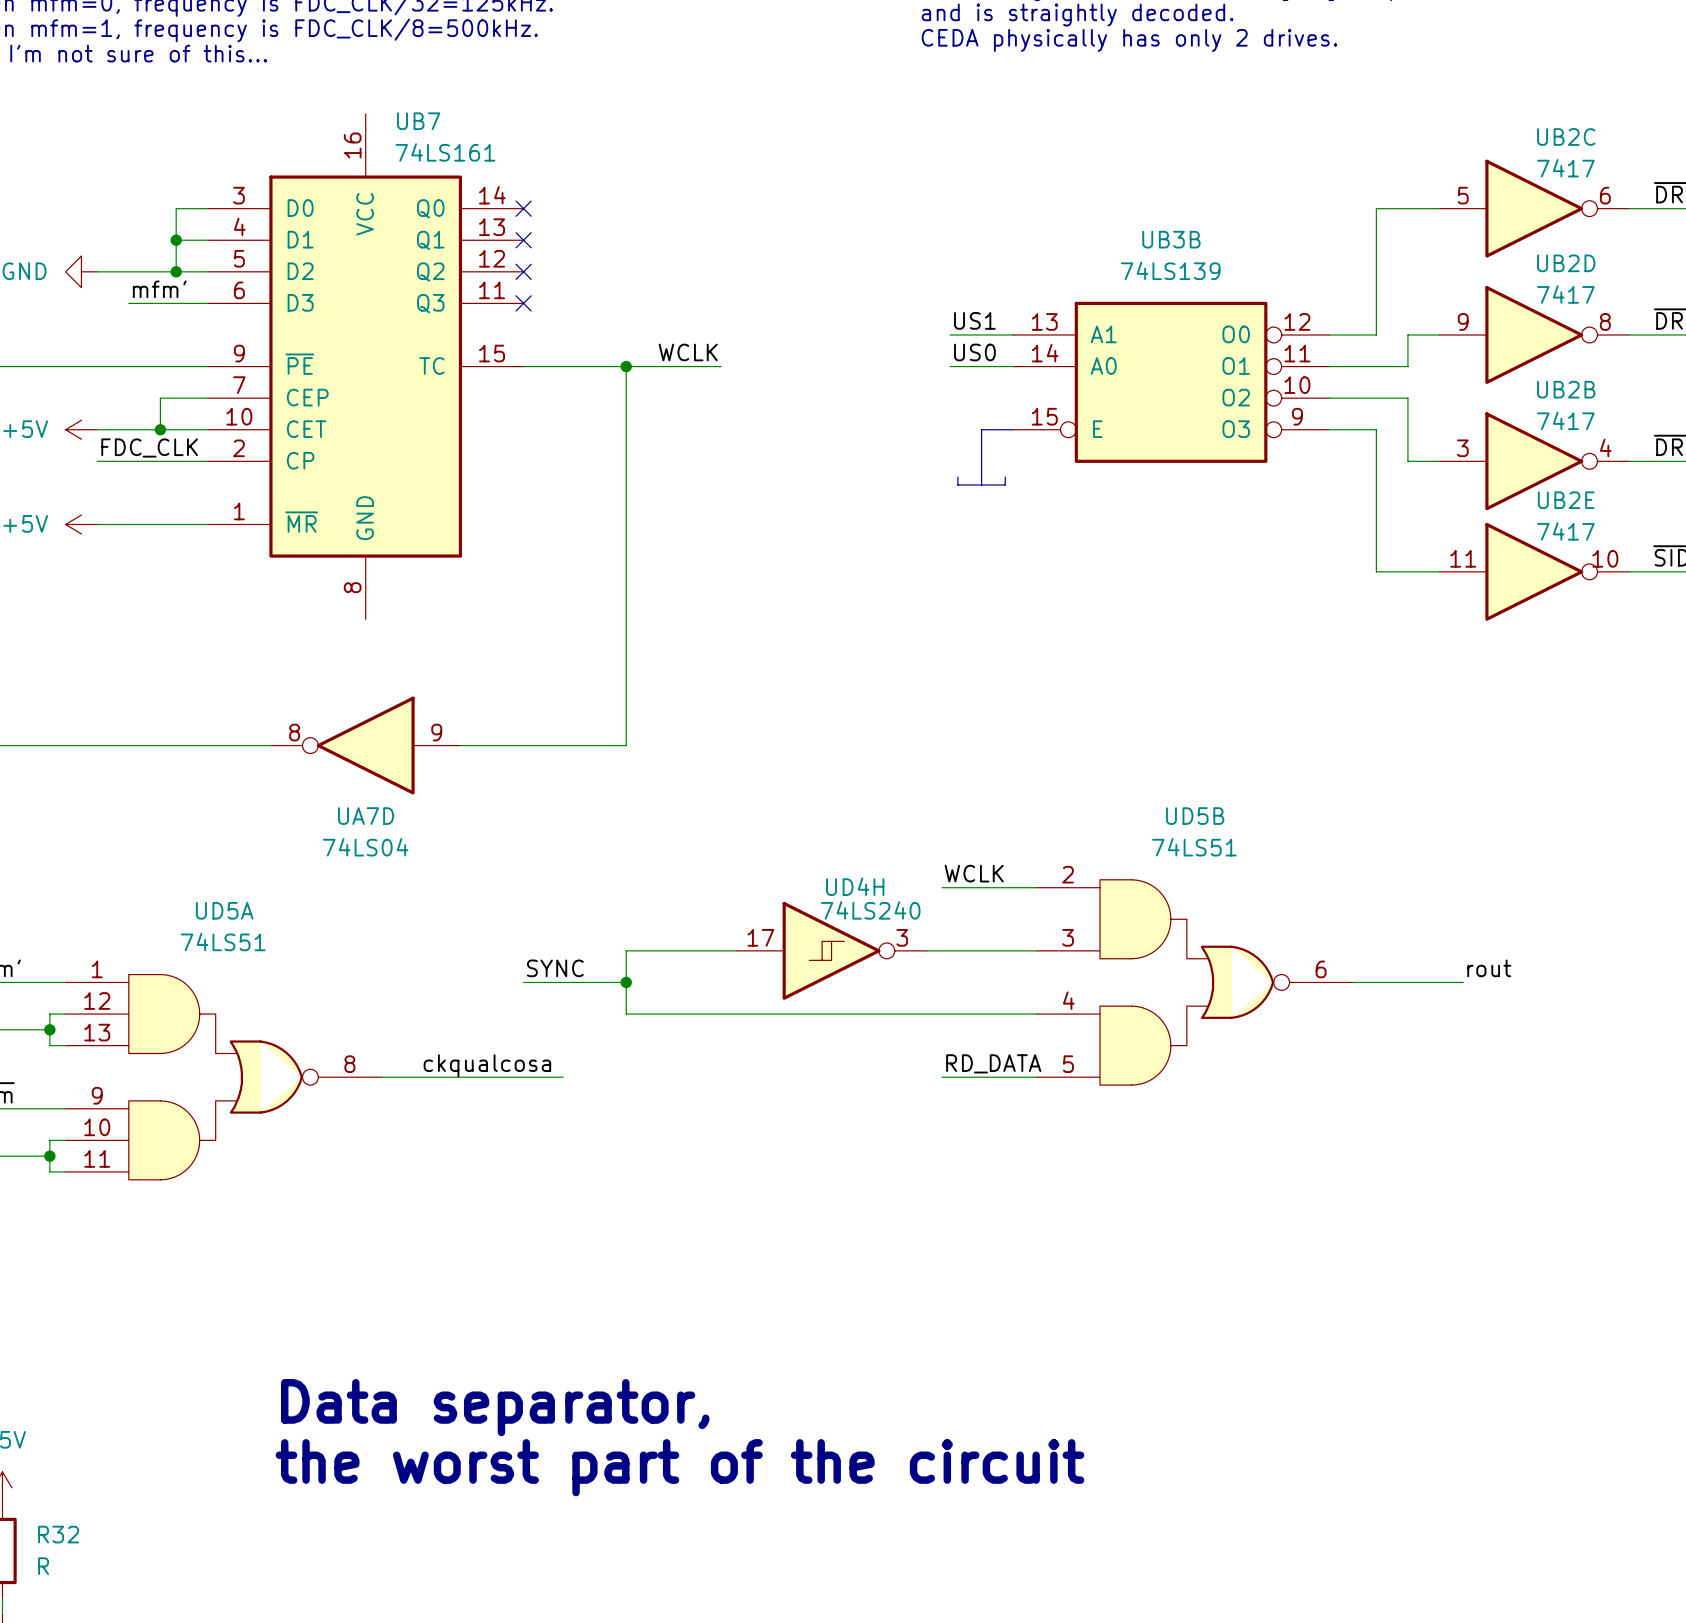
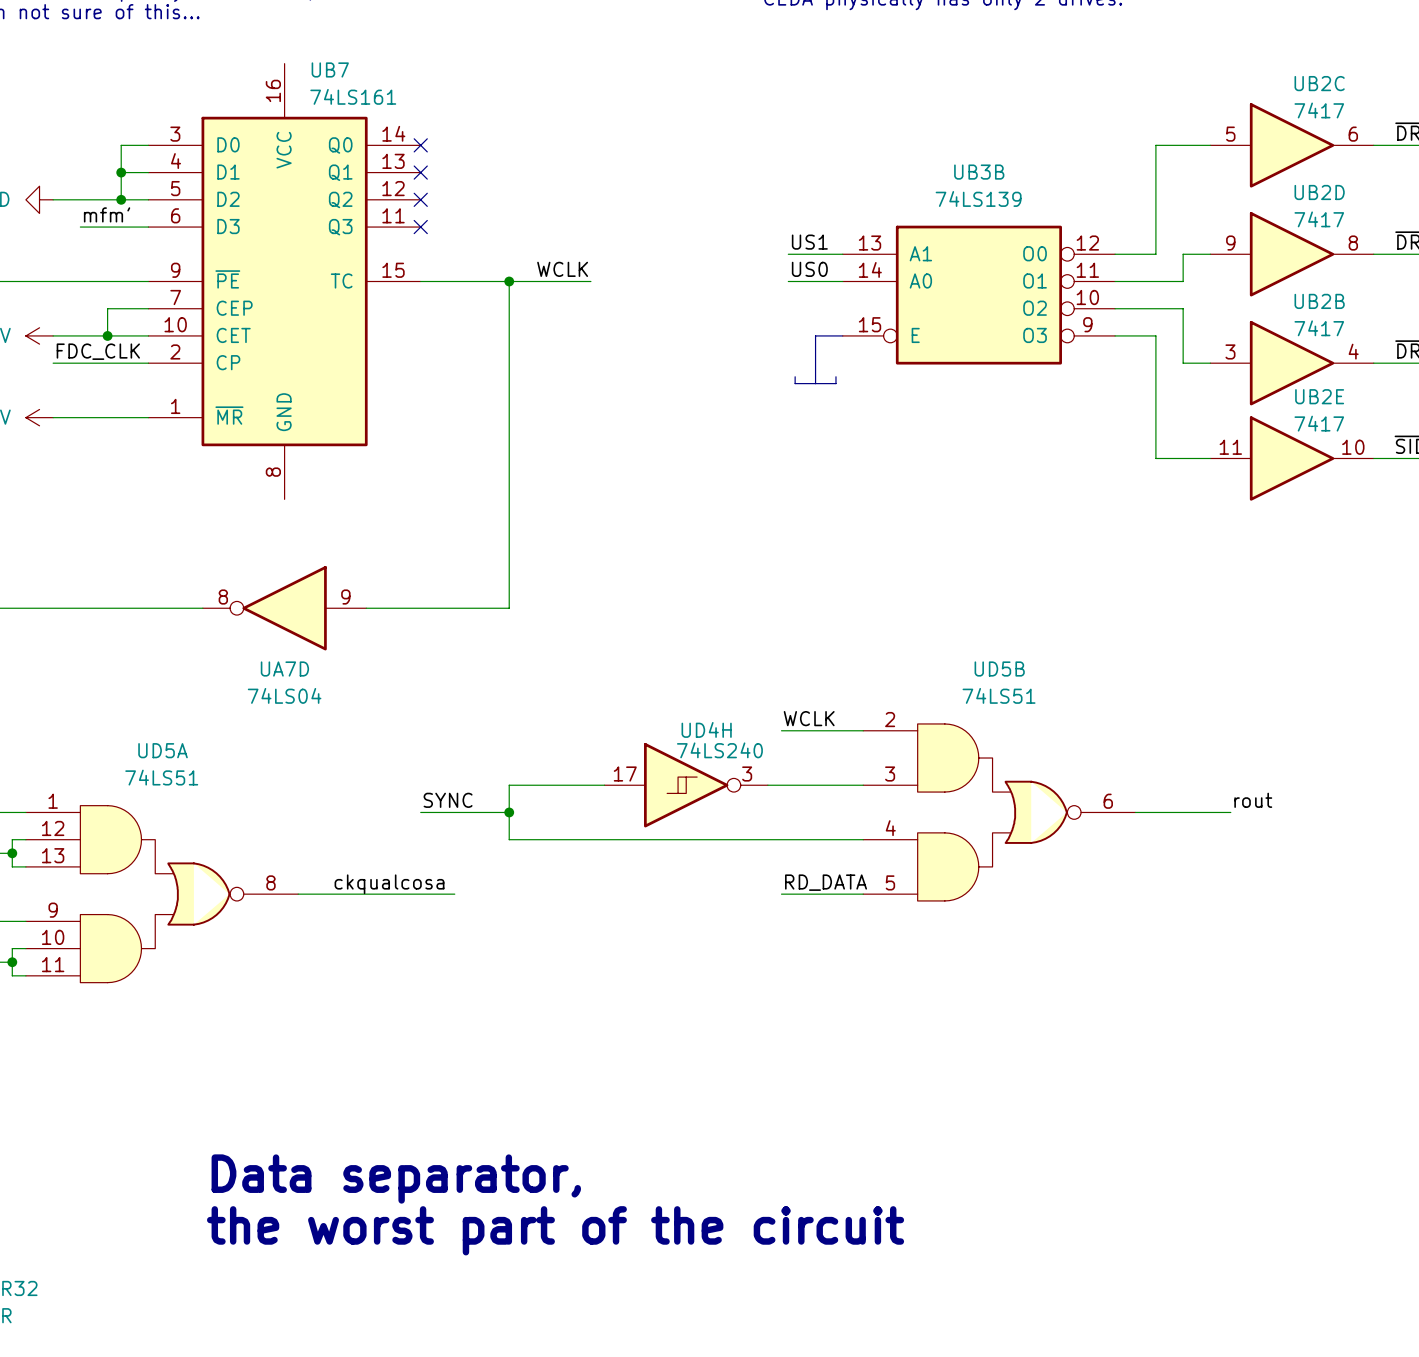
UB2C symbol: [1439, 159, 1630, 258] -> [1210, 103, 1374, 188]
UB2D symbol: [1439, 286, 1630, 384] -> [1210, 212, 1374, 297]
UB2B symbol: [1439, 412, 1630, 511] -> [1210, 320, 1374, 406]
UB2E symbol: [1439, 522, 1630, 621] -> [1210, 416, 1374, 501]

